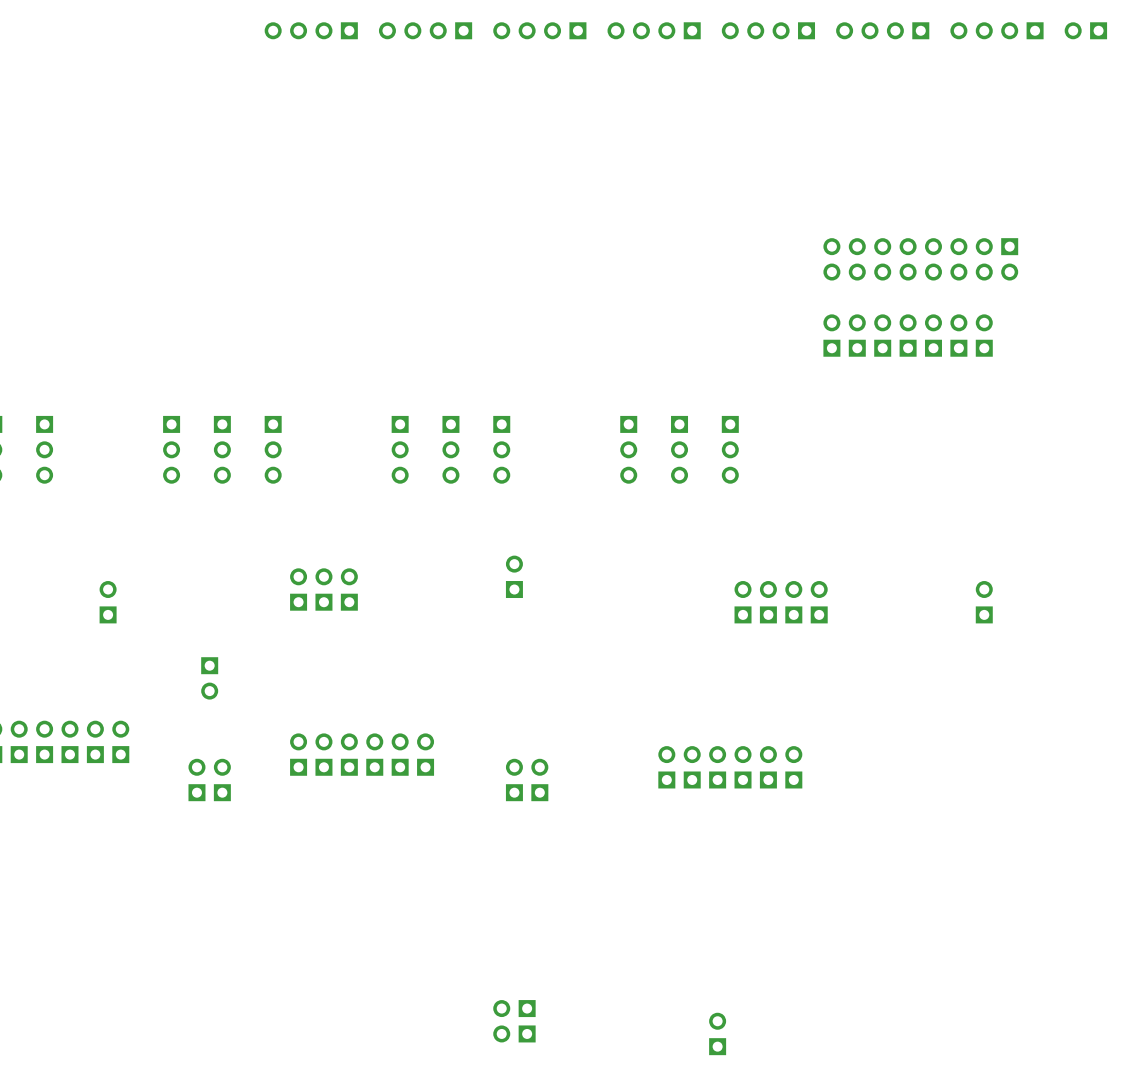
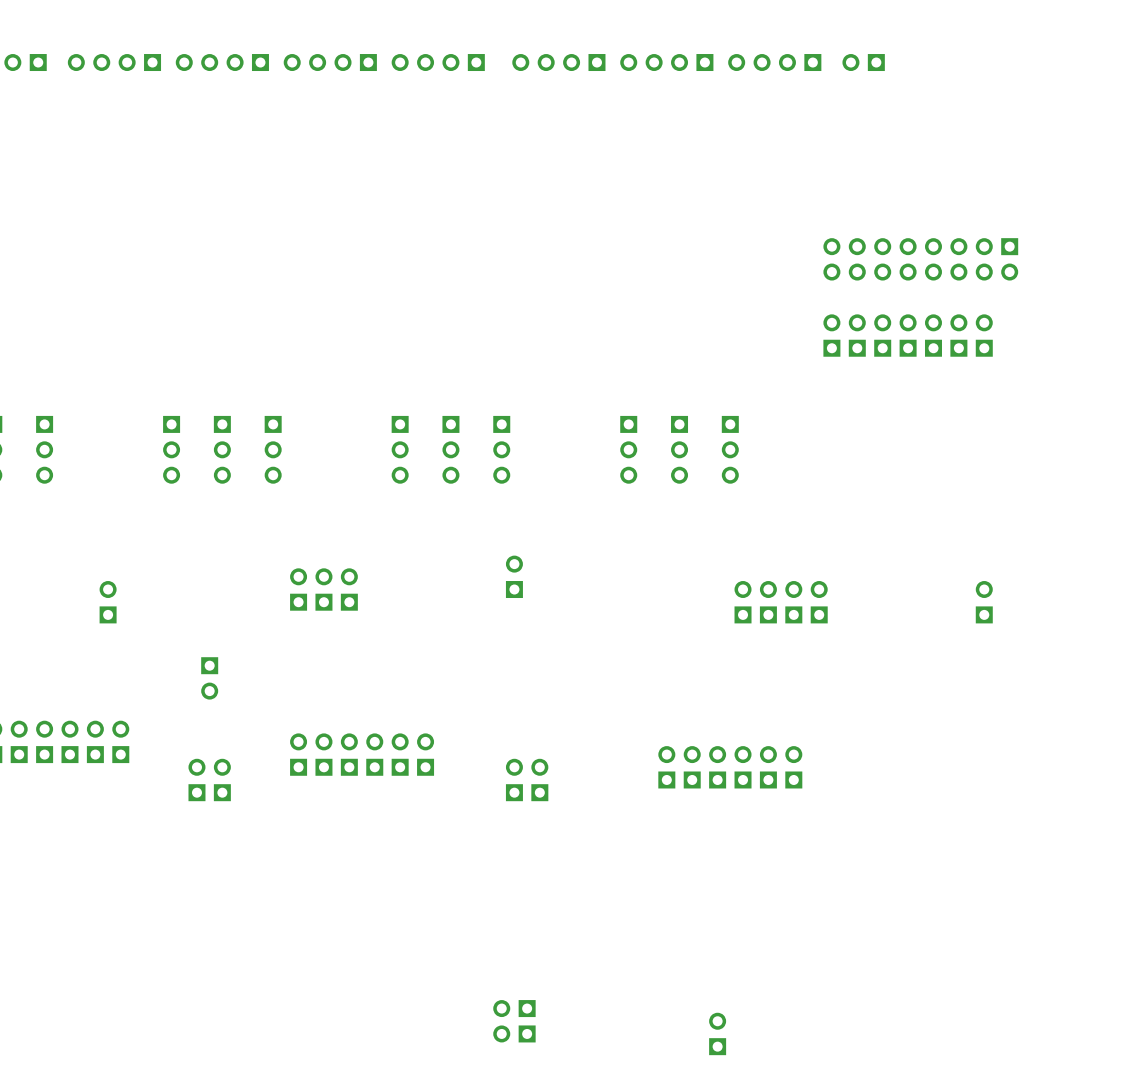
part position: (311, 30) -> (330, 62)
part position: (425, 30) -> (438, 62)
part position: (539, 30) -> (558, 62)
part position: (654, 30) -> (666, 62)
part position: (768, 30) -> (774, 62)
part: (882, 30) -> none
part: (996, 30) -> none
part position: (1085, 30) -> (863, 62)
part: none -> (25, 62)
part: none -> (114, 62)
part: none -> (222, 62)

